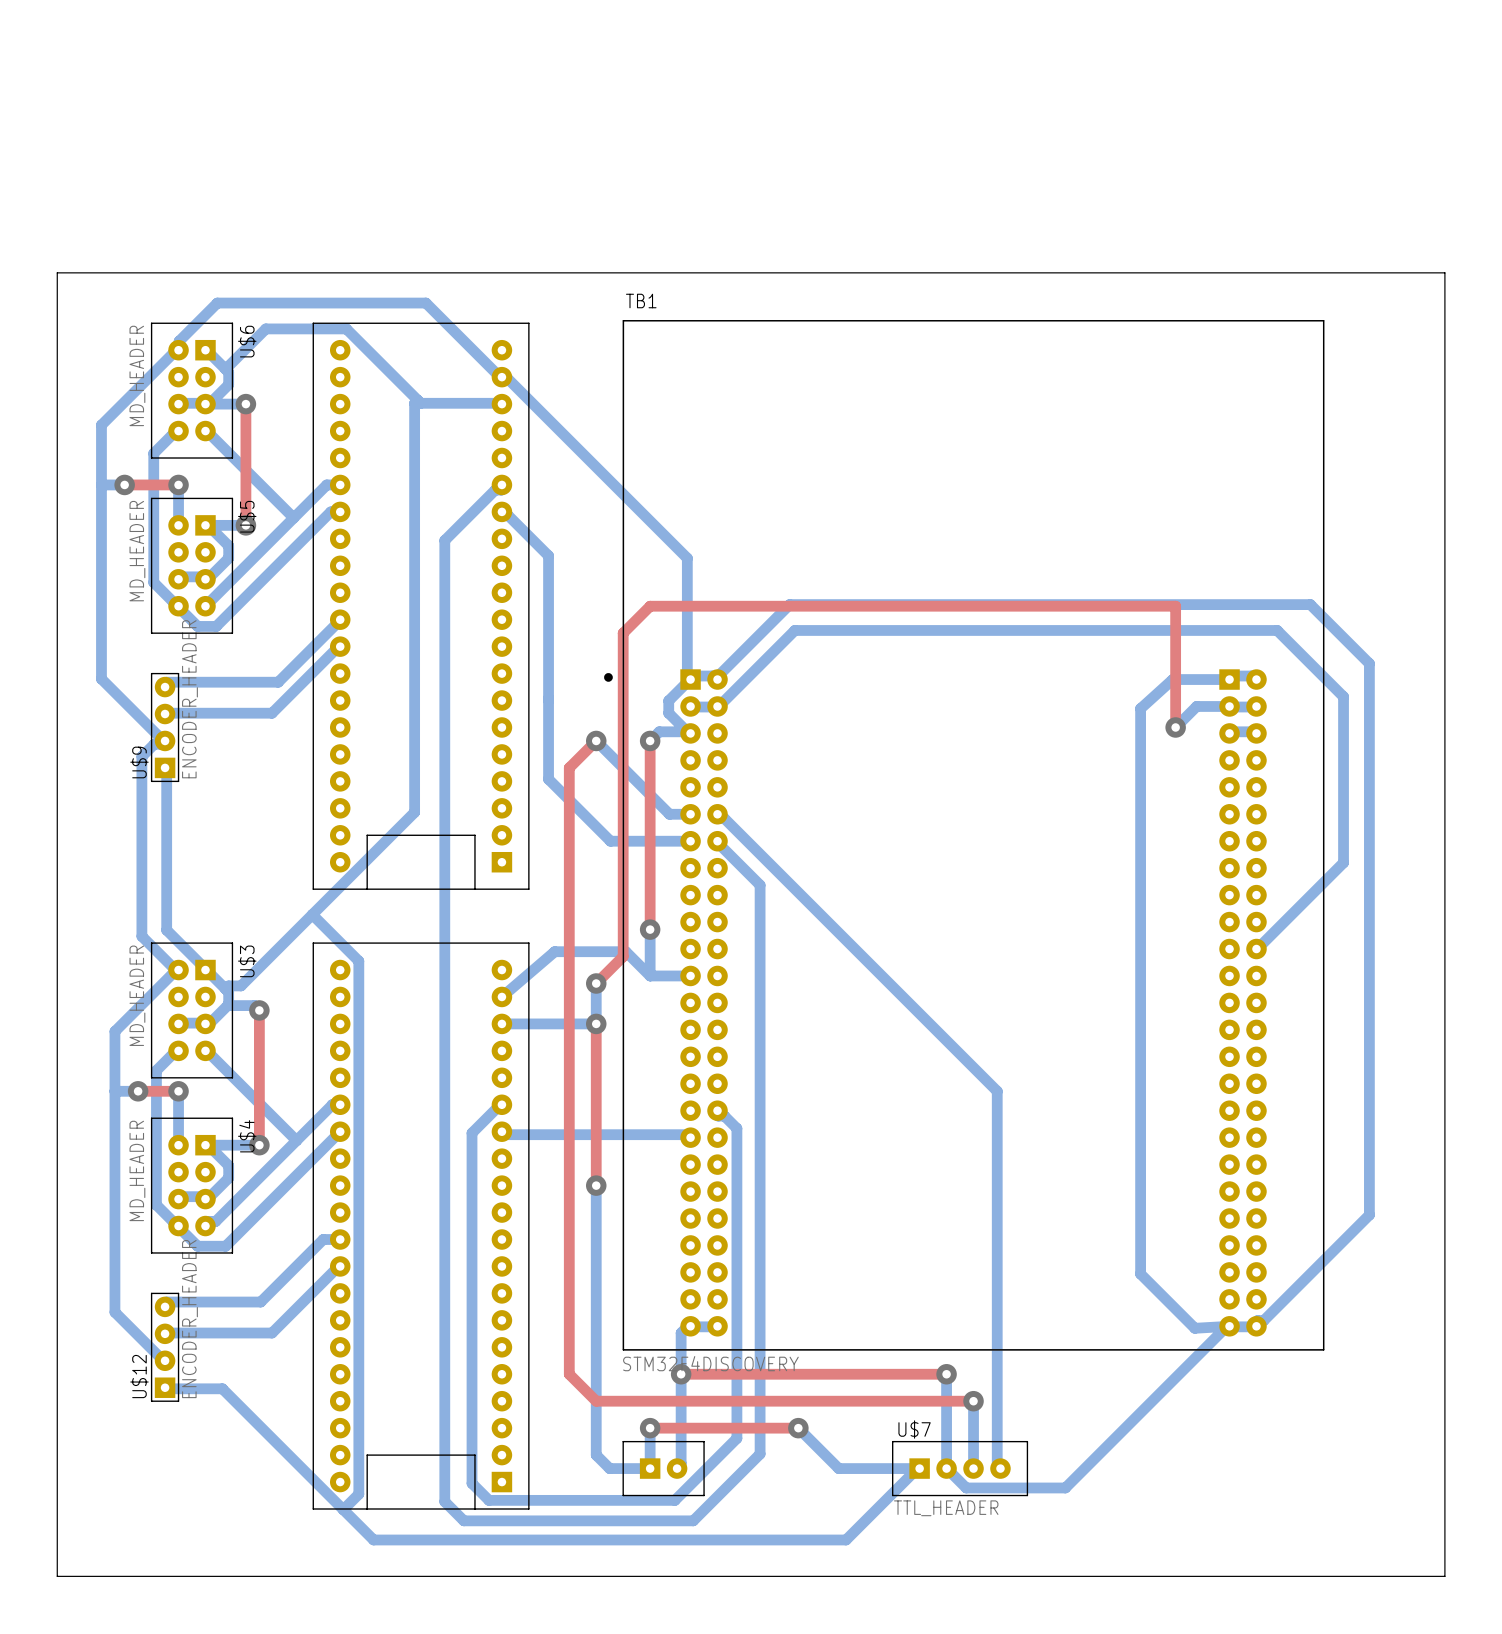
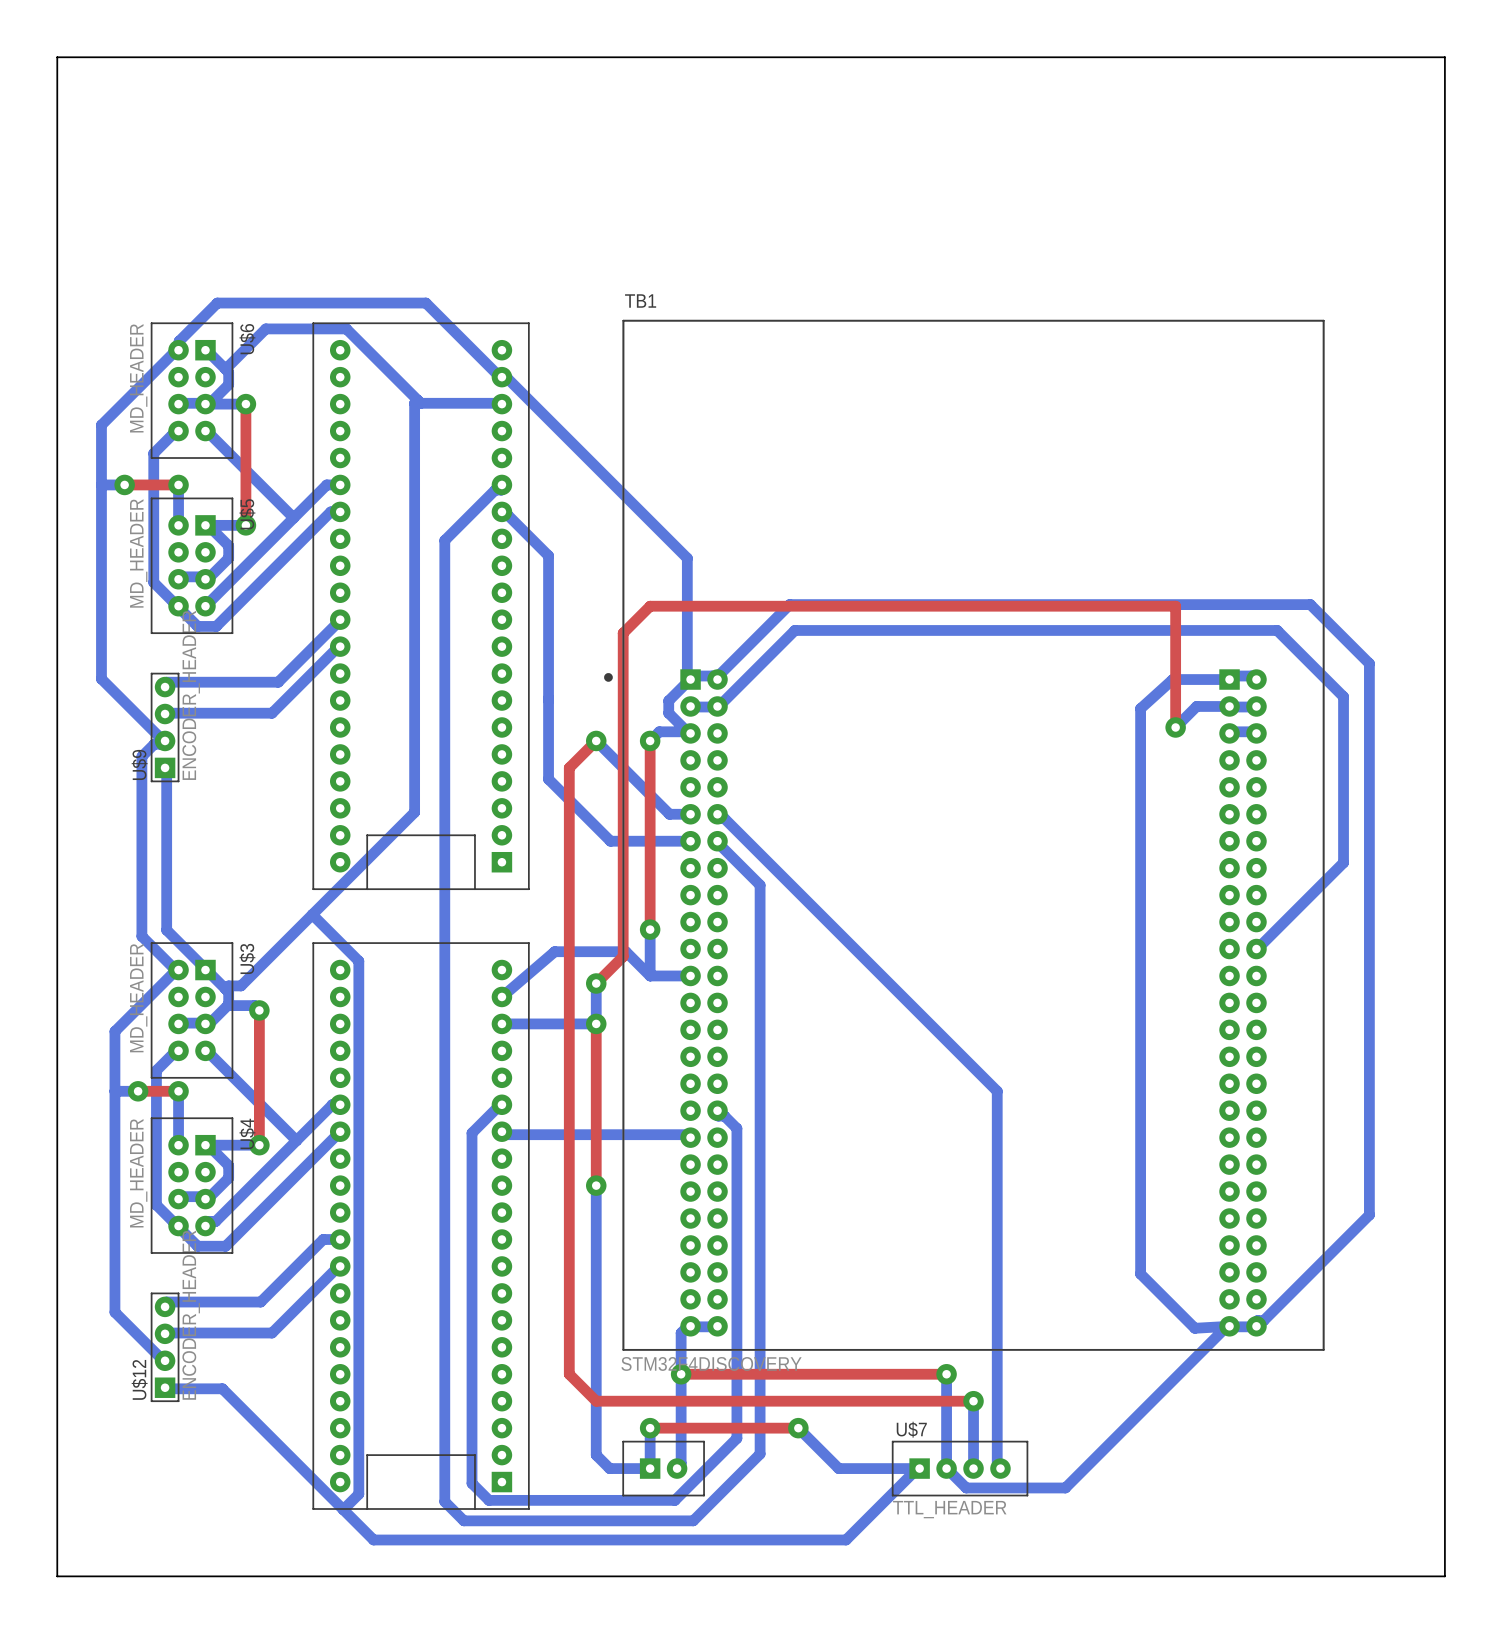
board edge: (57, 272) (1444, 272) -> (57, 272) (57, 57) (1444, 57) (1444, 272)

